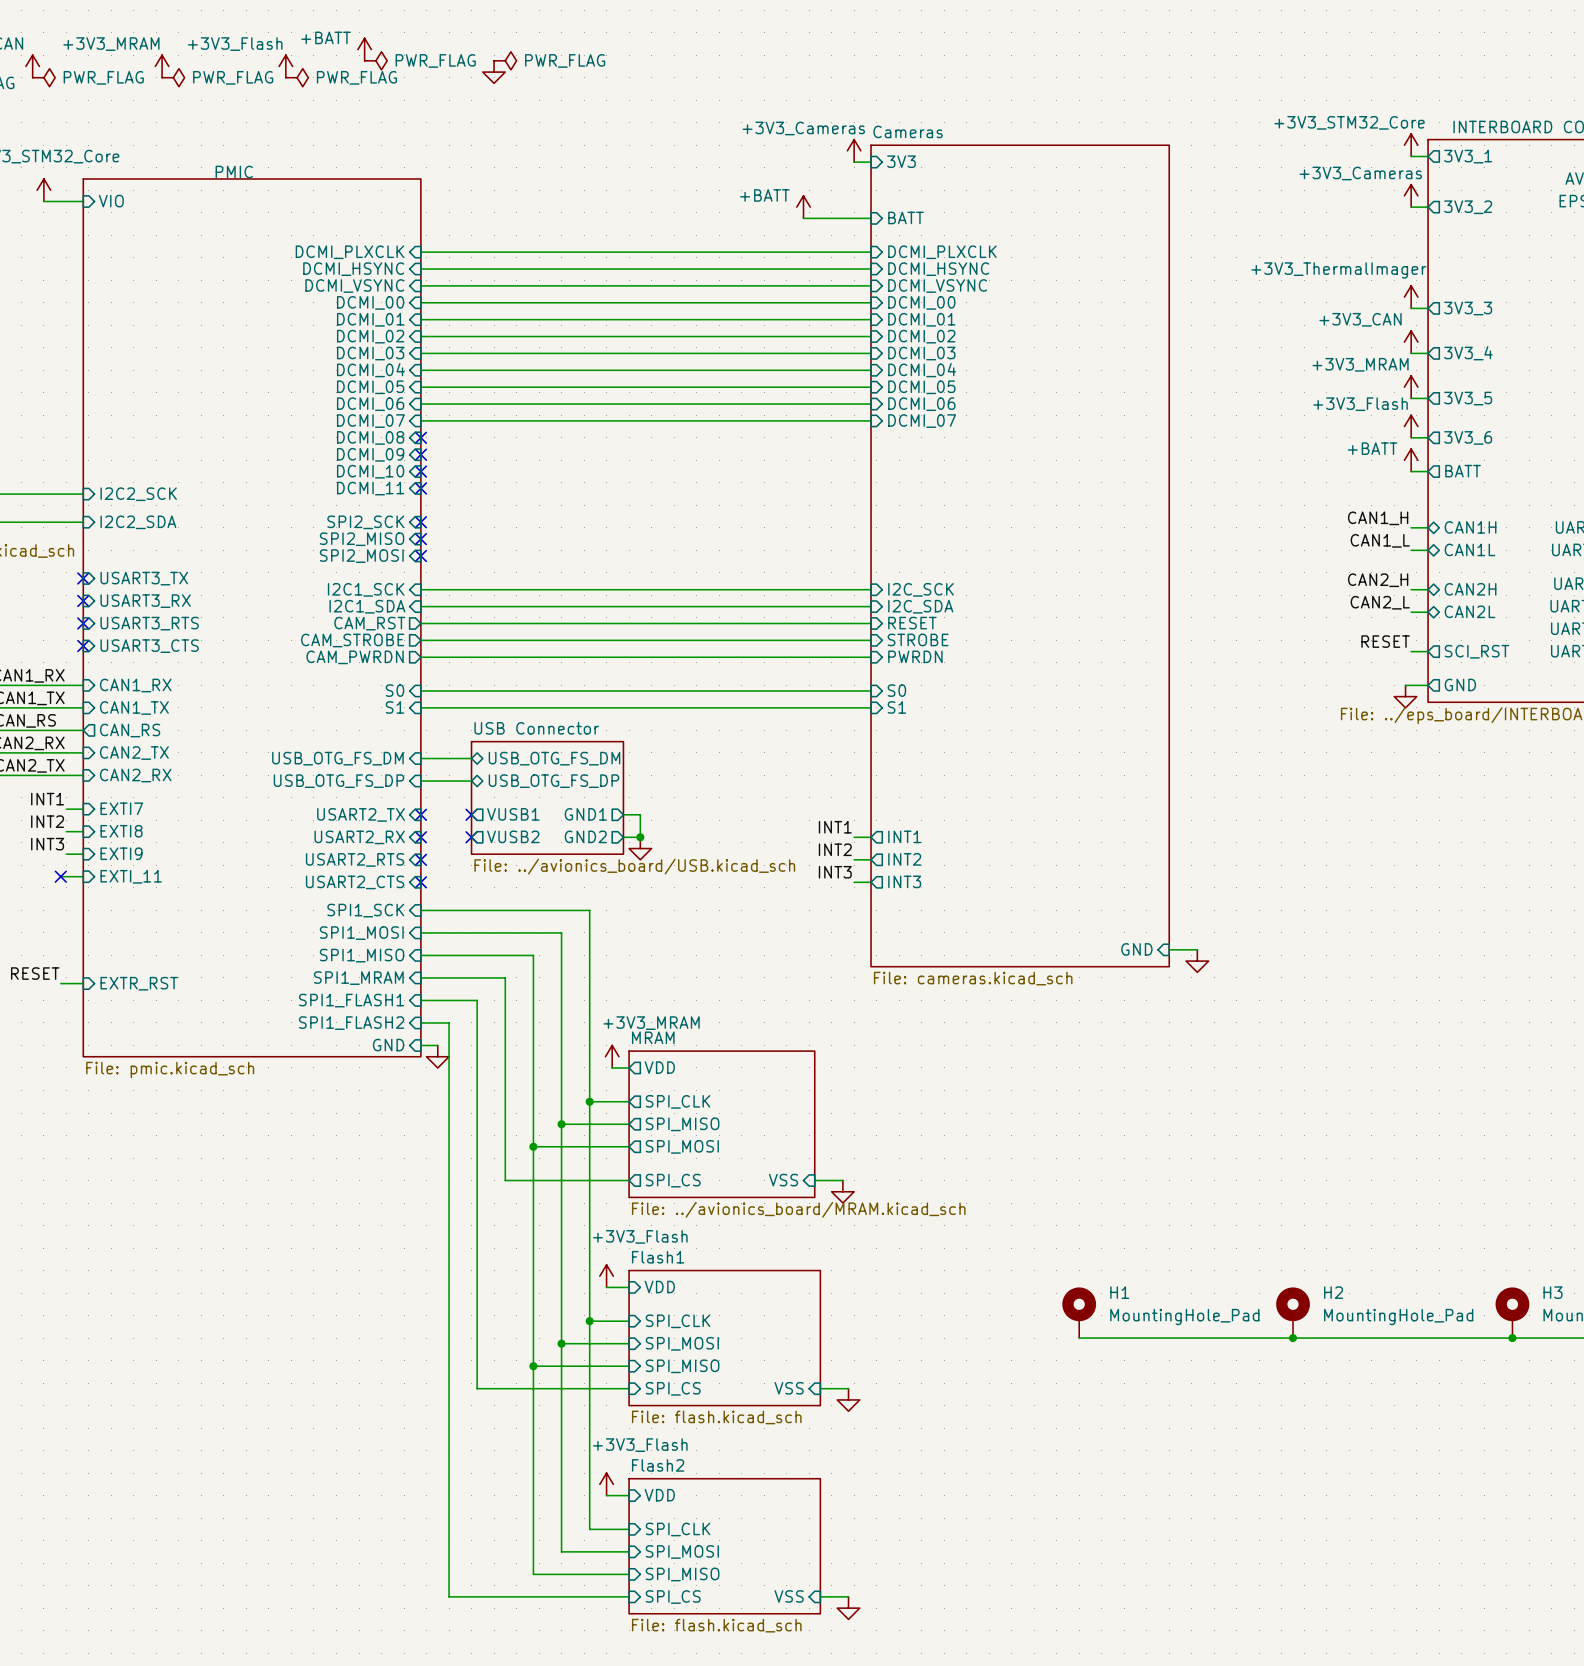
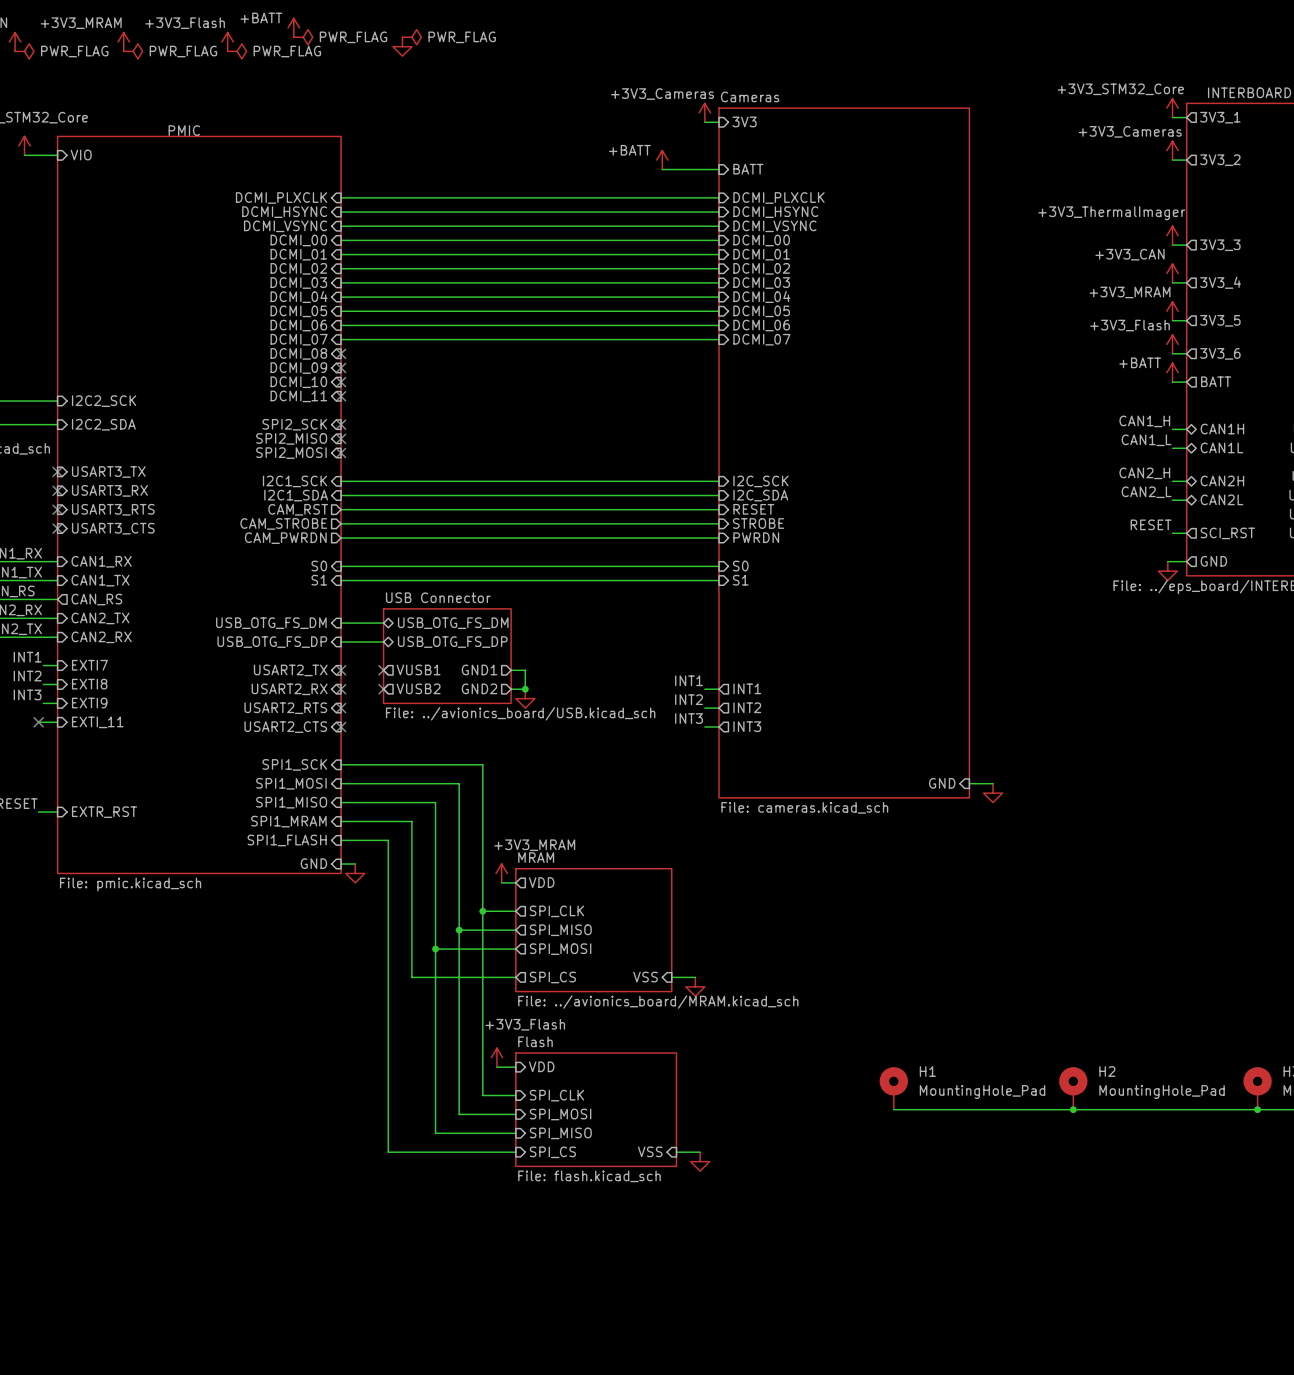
sheet pin position: SPI1_SCK (365, 910) -> SPI1_SCK (294, 764)
wire: (420, 910) (589, 910) (589, 927) -> (341, 764) (482, 764)
wire: (420, 932) (561, 932) (561, 949) -> (341, 783) (459, 783)
sheet pin position: SPI1_MOSI (361, 933) -> SPI1_MOSI (291, 783)
sheet pin position: SPI1_MISO (362, 955) -> SPI1_MISO (291, 802)
wire: (420, 955) (533, 955) (533, 972) -> (341, 802) (435, 802)
wire: (420, 977) (505, 977) (505, 994) -> (341, 821) (411, 821)
sheet pin position: SPI1_MRAM (358, 978) -> SPI1_MRAM (288, 821)
sheet pin: SPI1_FLASH1 (351, 1000) -> none
wire: (420, 1000) (477, 1000) (477, 1017) -> (341, 840) (388, 840)
wire: (420, 1022) (449, 1022) (449, 1596) (629, 1596) -> none
sheet pin: SPI1_FLASH2 (351, 1023) -> SPI1_FLASH (287, 840)
sheet Flash1 name: Flash1 (658, 1257) -> Flash (535, 1041)
wire: (589, 1321) (589, 1529) (629, 1529) -> none
junction: (589, 1321) -> none
wire: (561, 1343) (561, 1551) (629, 1551) -> none
junction: (561, 1343) -> none
wire: (533, 1366) (533, 1574) (629, 1574) -> none
junction: (533, 1366) -> none
power symbol: +3V3_Flash (606, 1484) -> none
wire: (606, 1495) (629, 1495) -> none
sheet pin: VDD (659, 1495) -> none
sheet pin: SPI_CLK (678, 1529) -> none
sheet Flash2: File: flash.kicad_sch (724, 1546) -> none
sheet pin: SPI_MOSI (682, 1551) -> none
sheet pin: SPI_MISO (682, 1574) -> none
sheet pin: VSS (789, 1596) -> none
wire: (820, 1596) (848, 1596) -> none
sheet pin: SPI_CS (673, 1597) -> none
power symbol: (848, 1608) -> none

